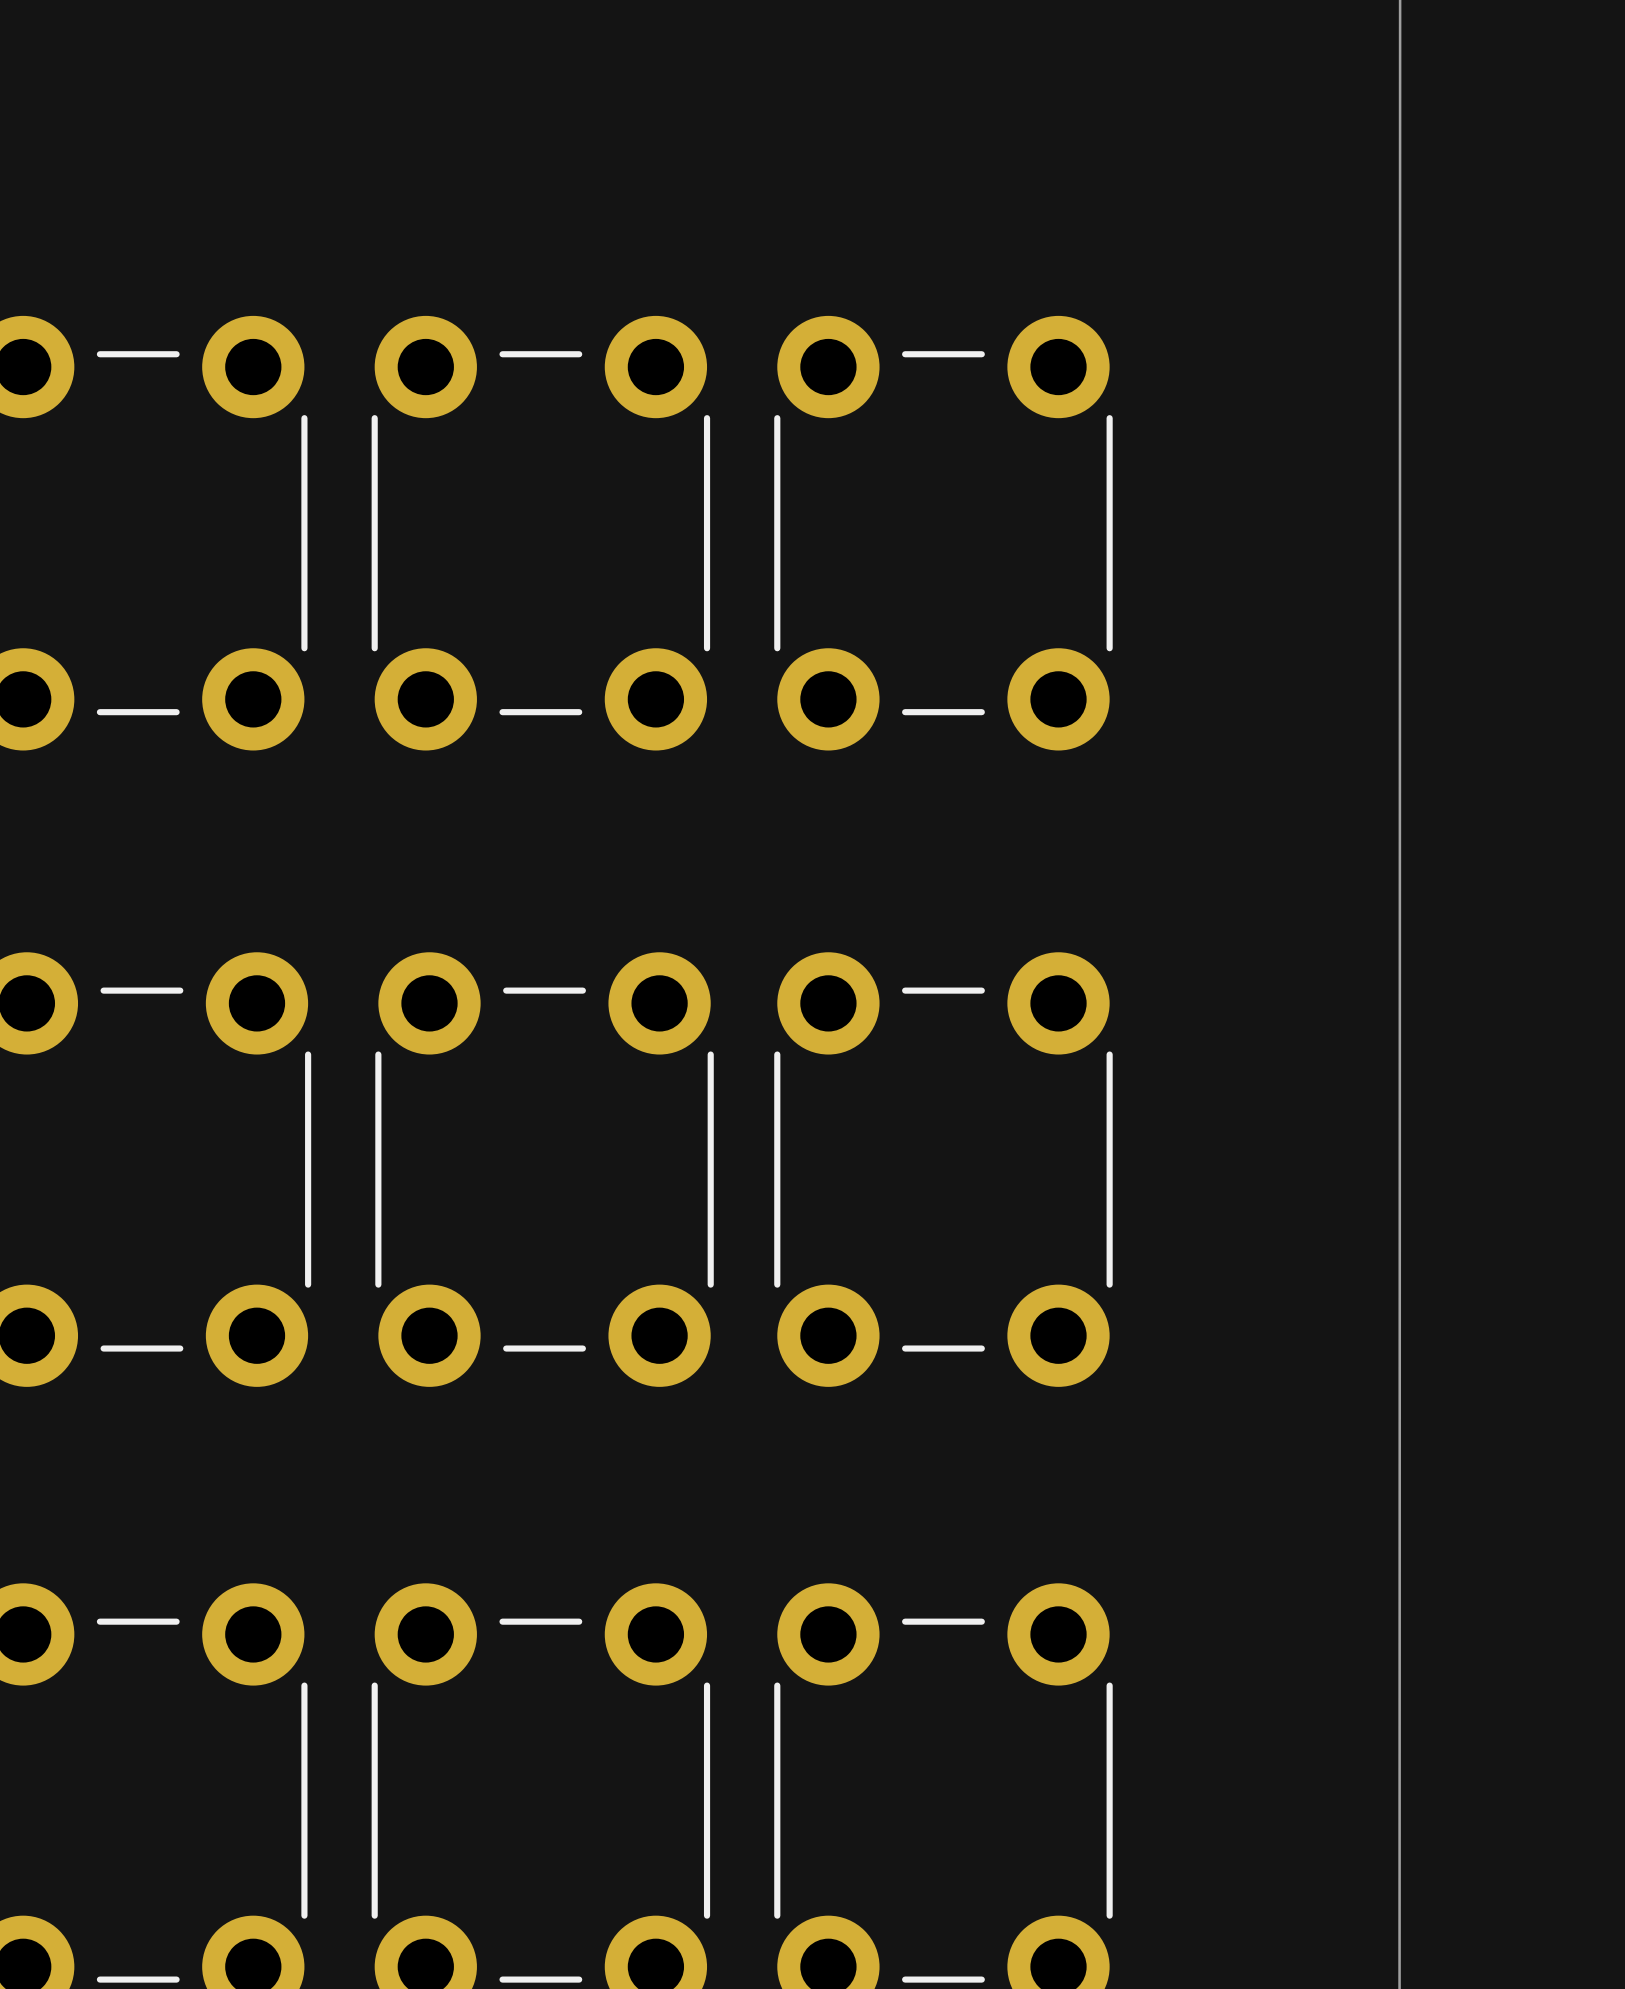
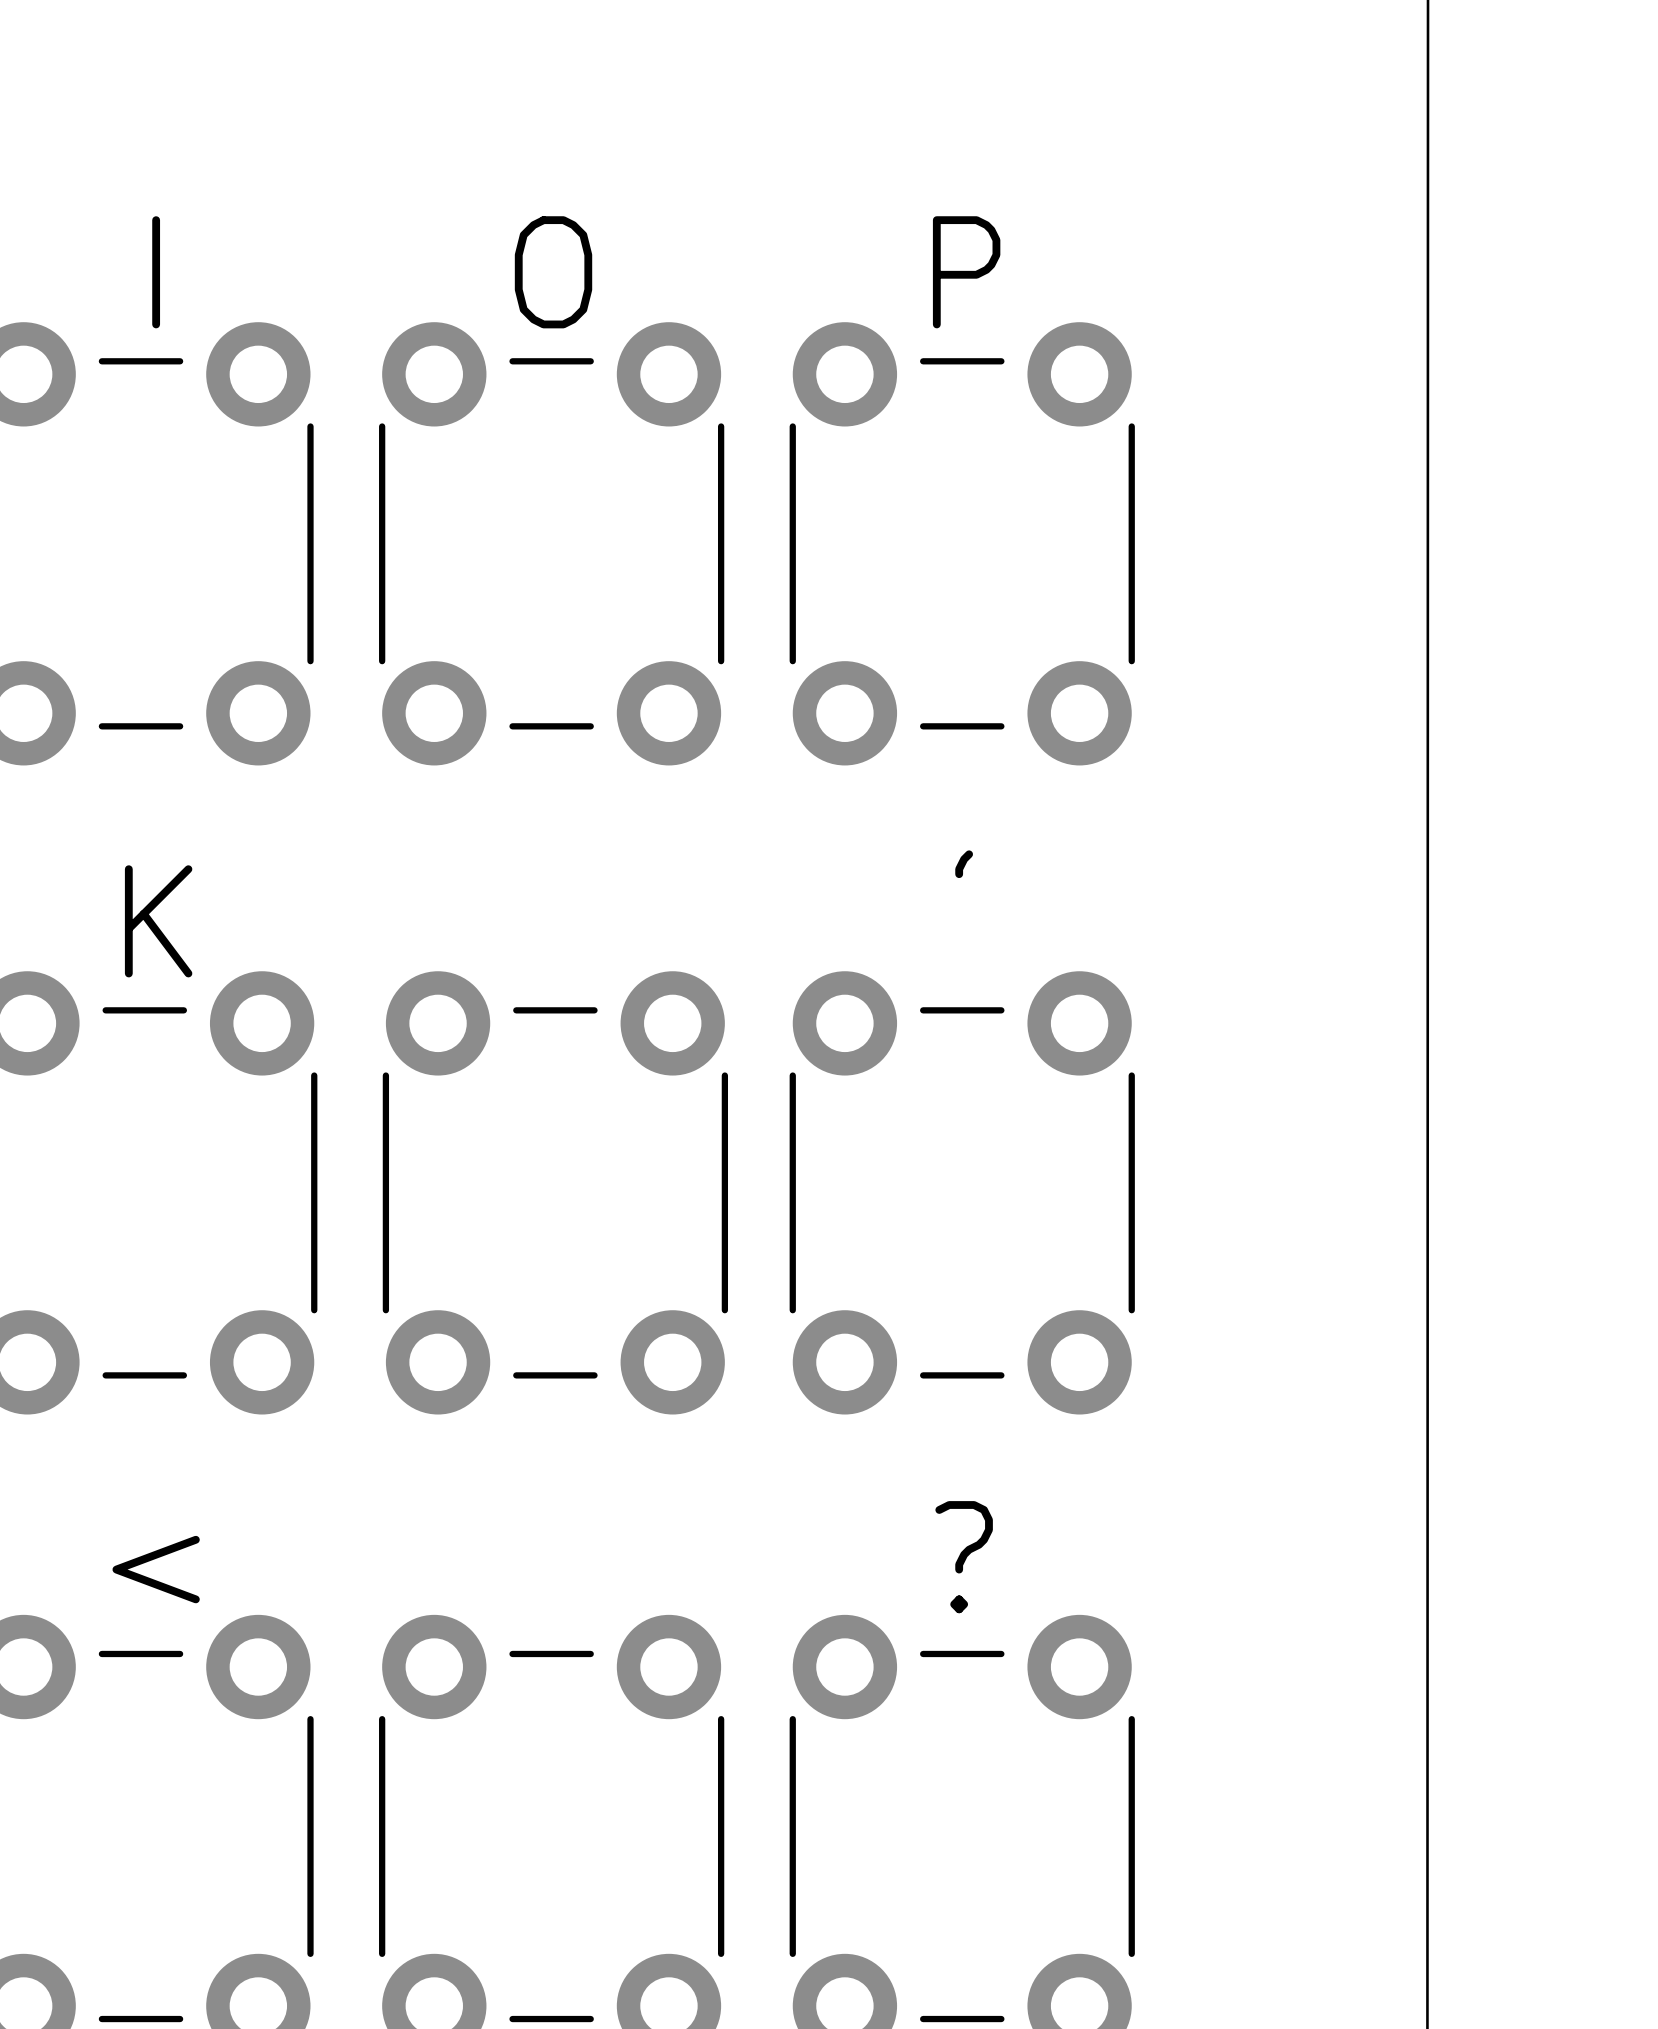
text: none -> I (156, 272)
text: none -> O (553, 272)
text: none -> P (966, 272)
text: none -> ‘ (964, 864)
text: none -> K (158, 921)
text: none -> ? (964, 1557)
text: none -> < (156, 1569)

